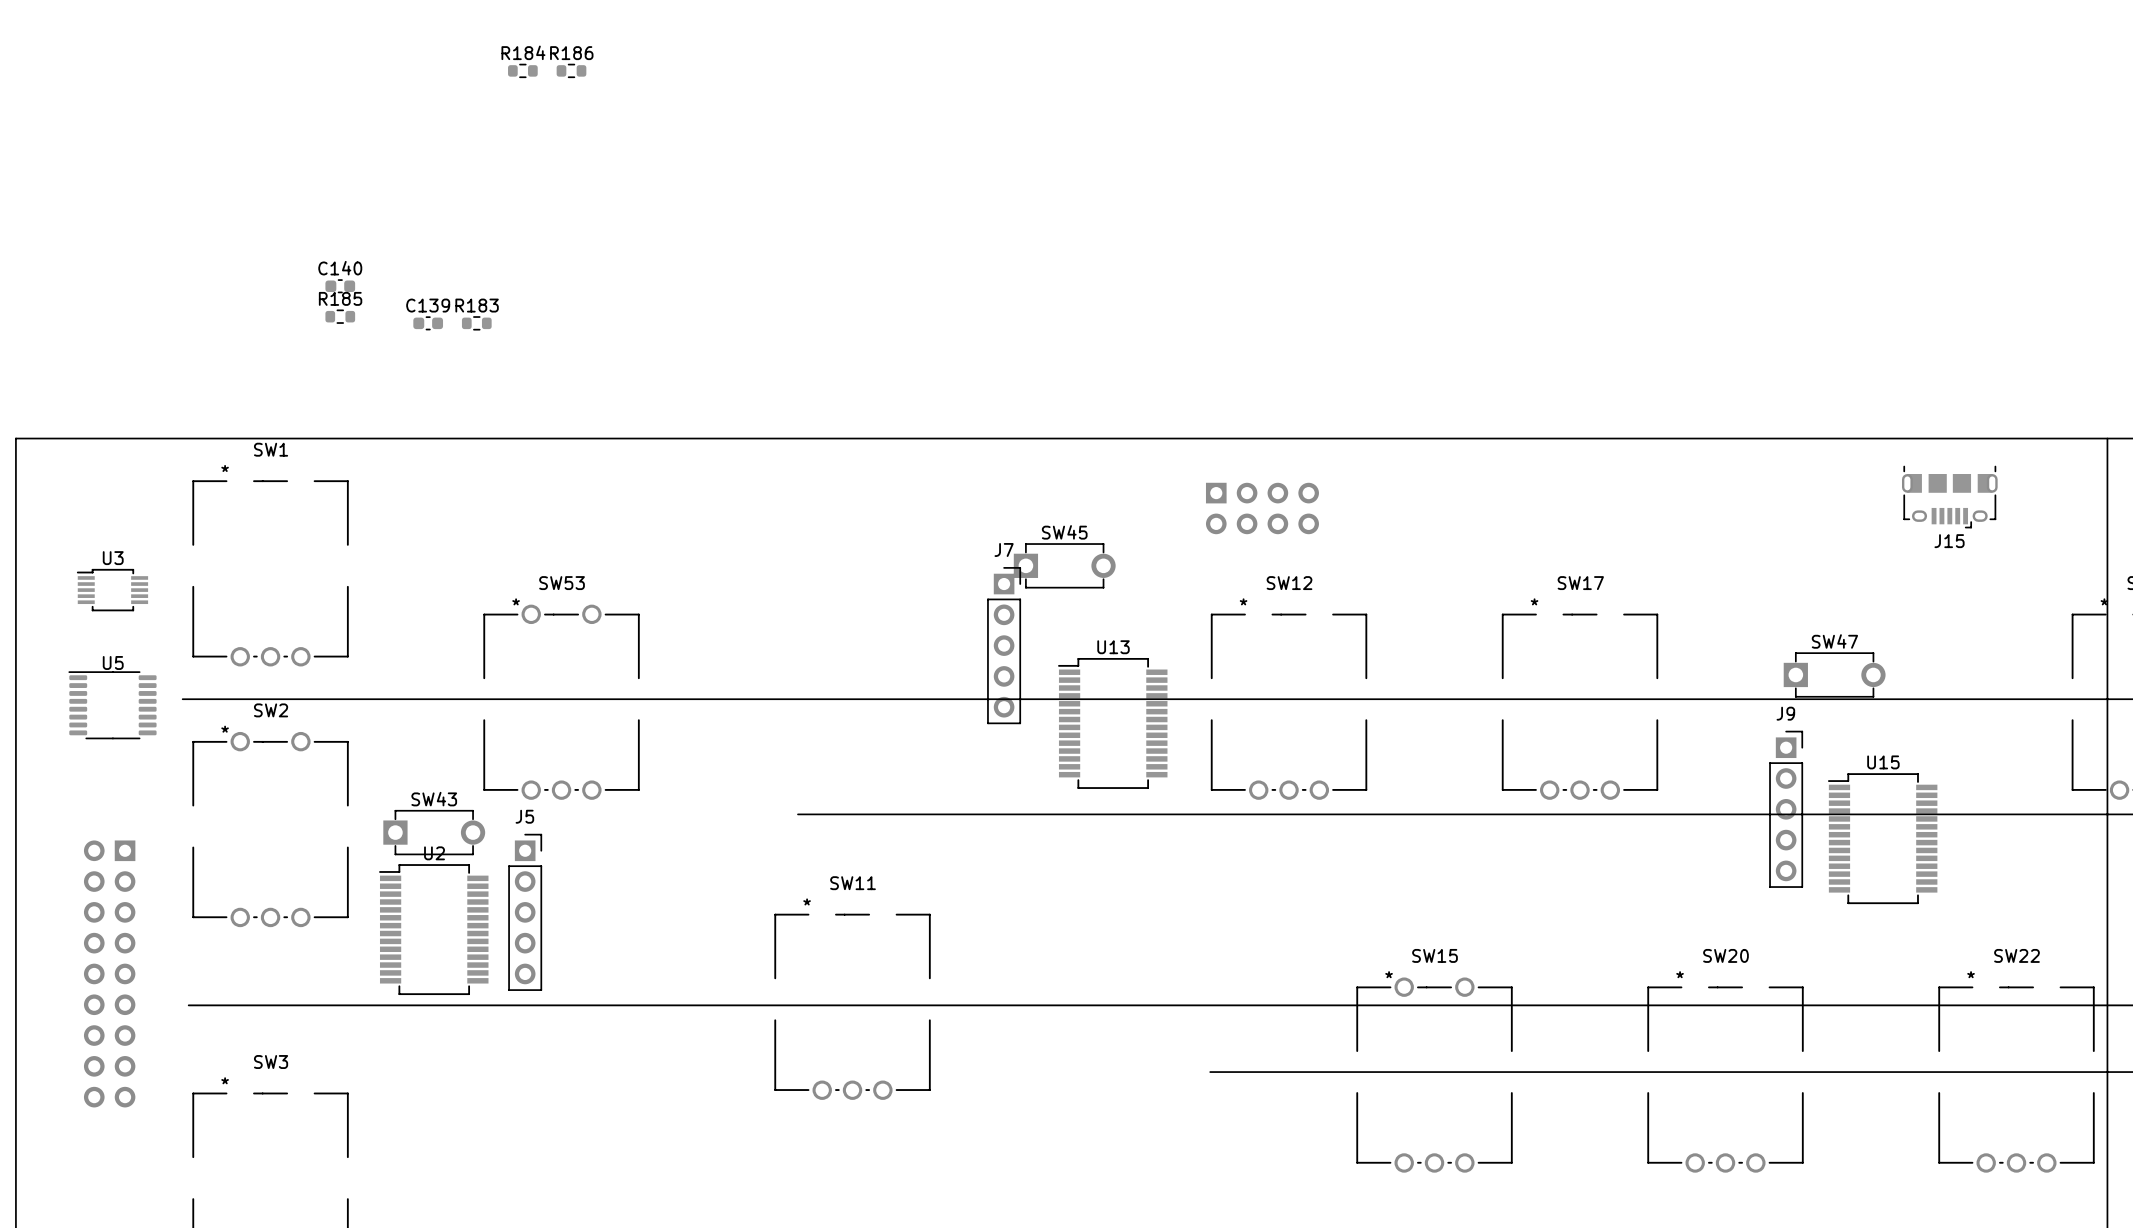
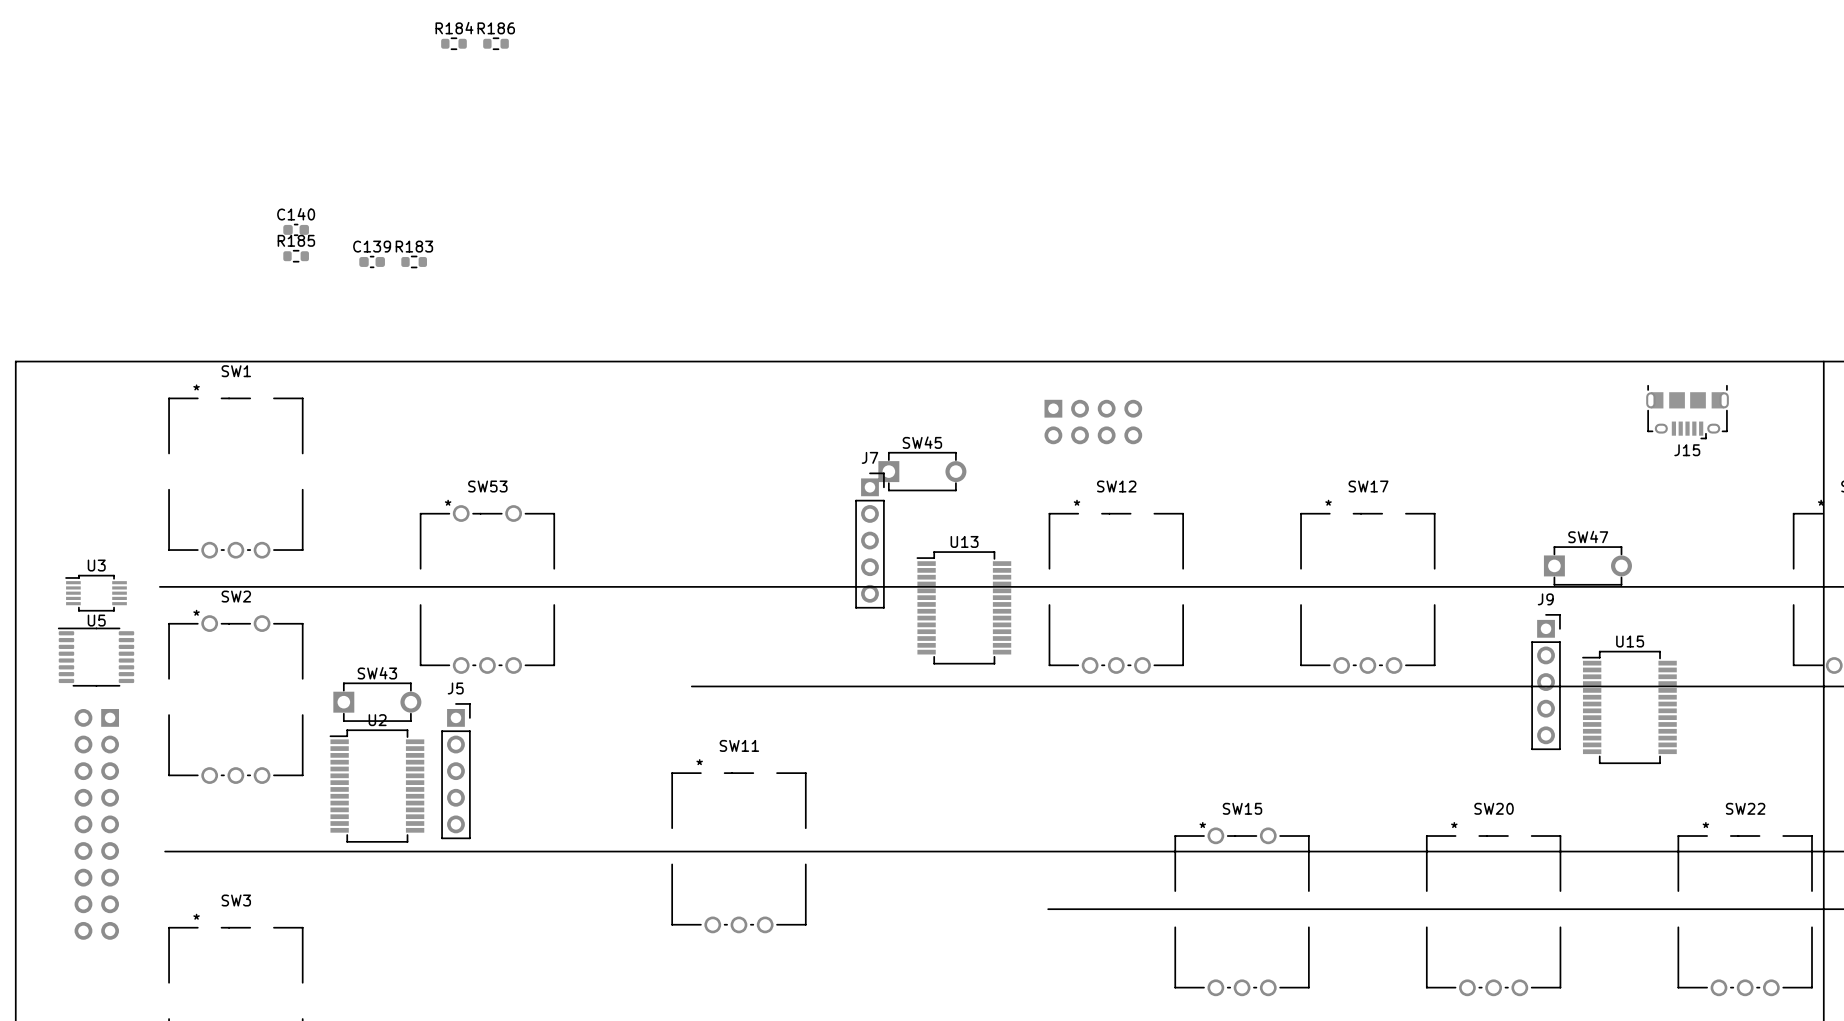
U3 position: (112, 590) -> (96, 593)
U5 position: (112, 705) -> (96, 657)

